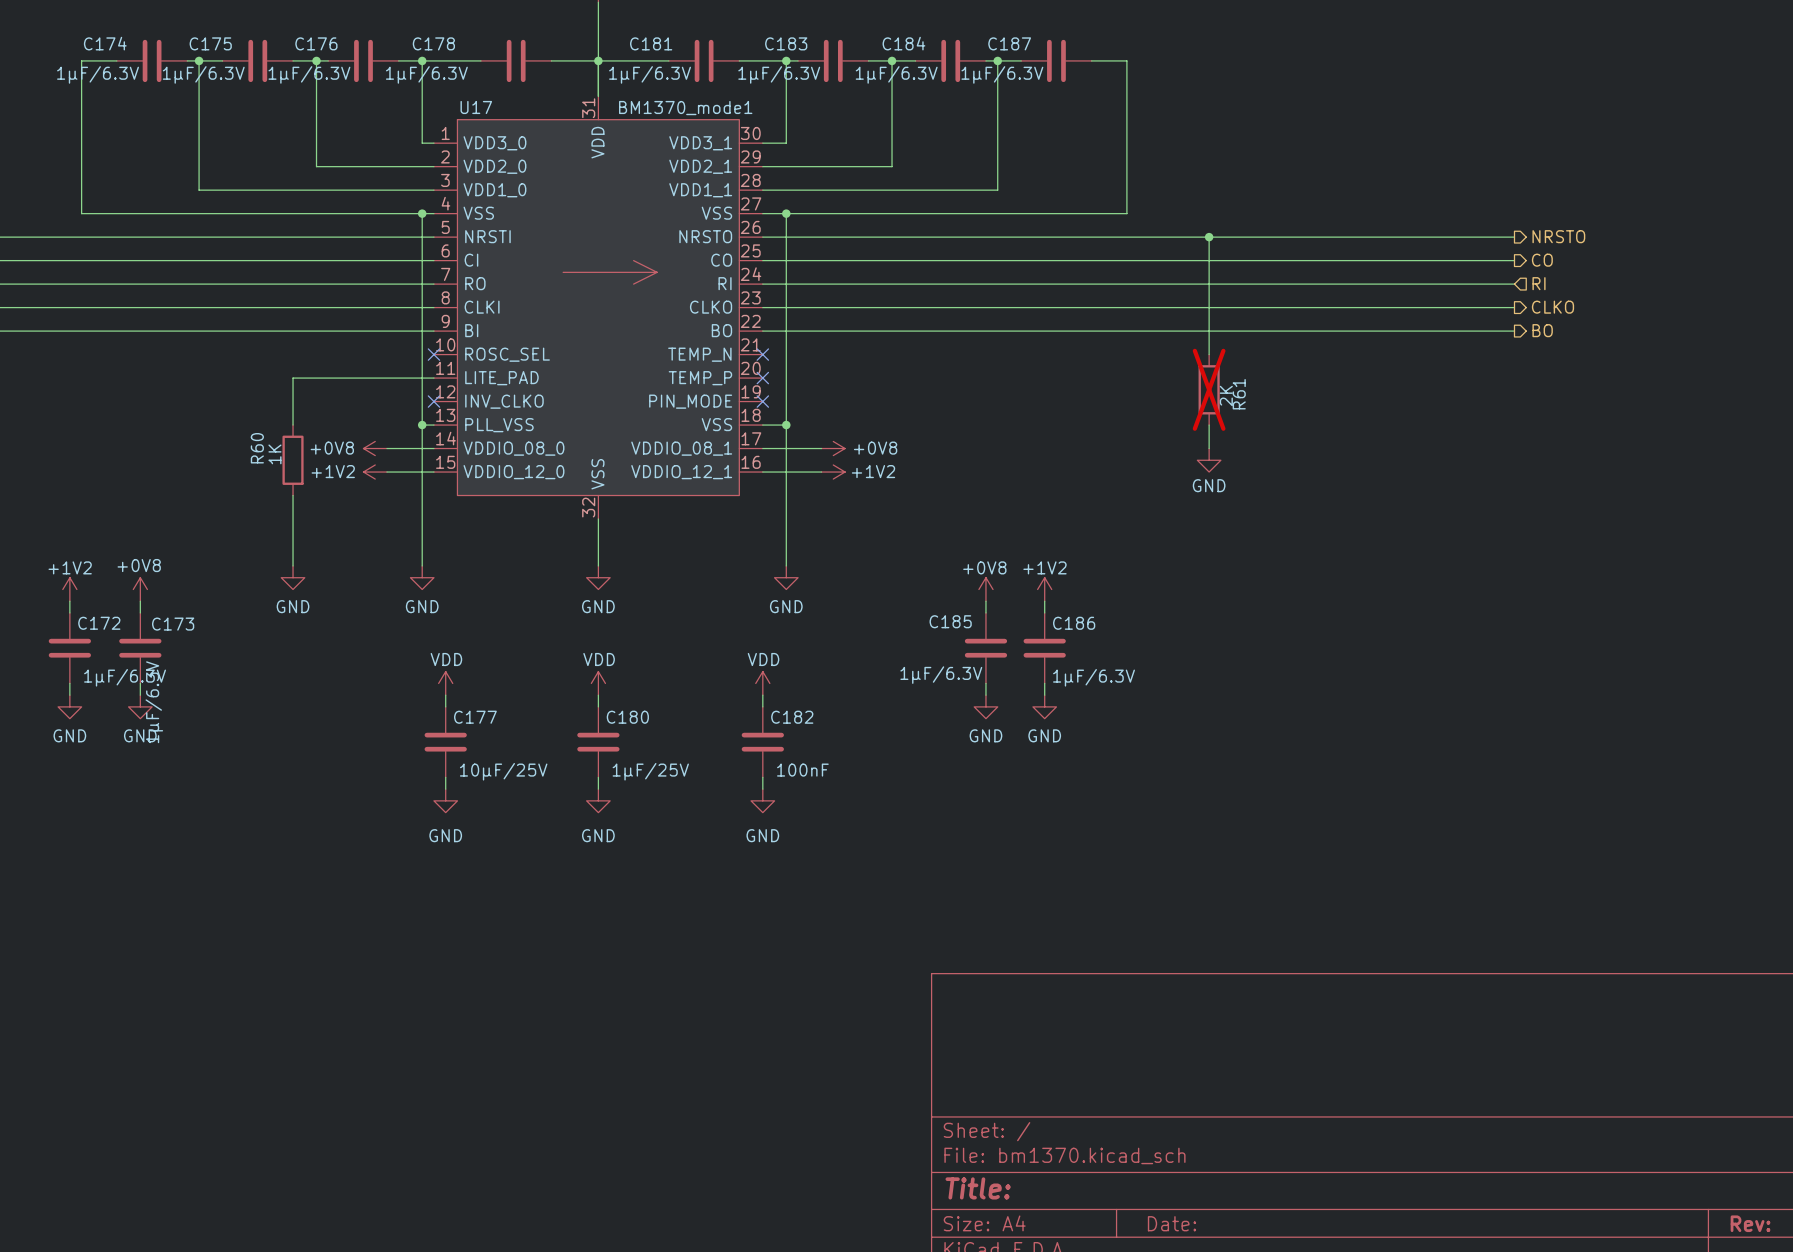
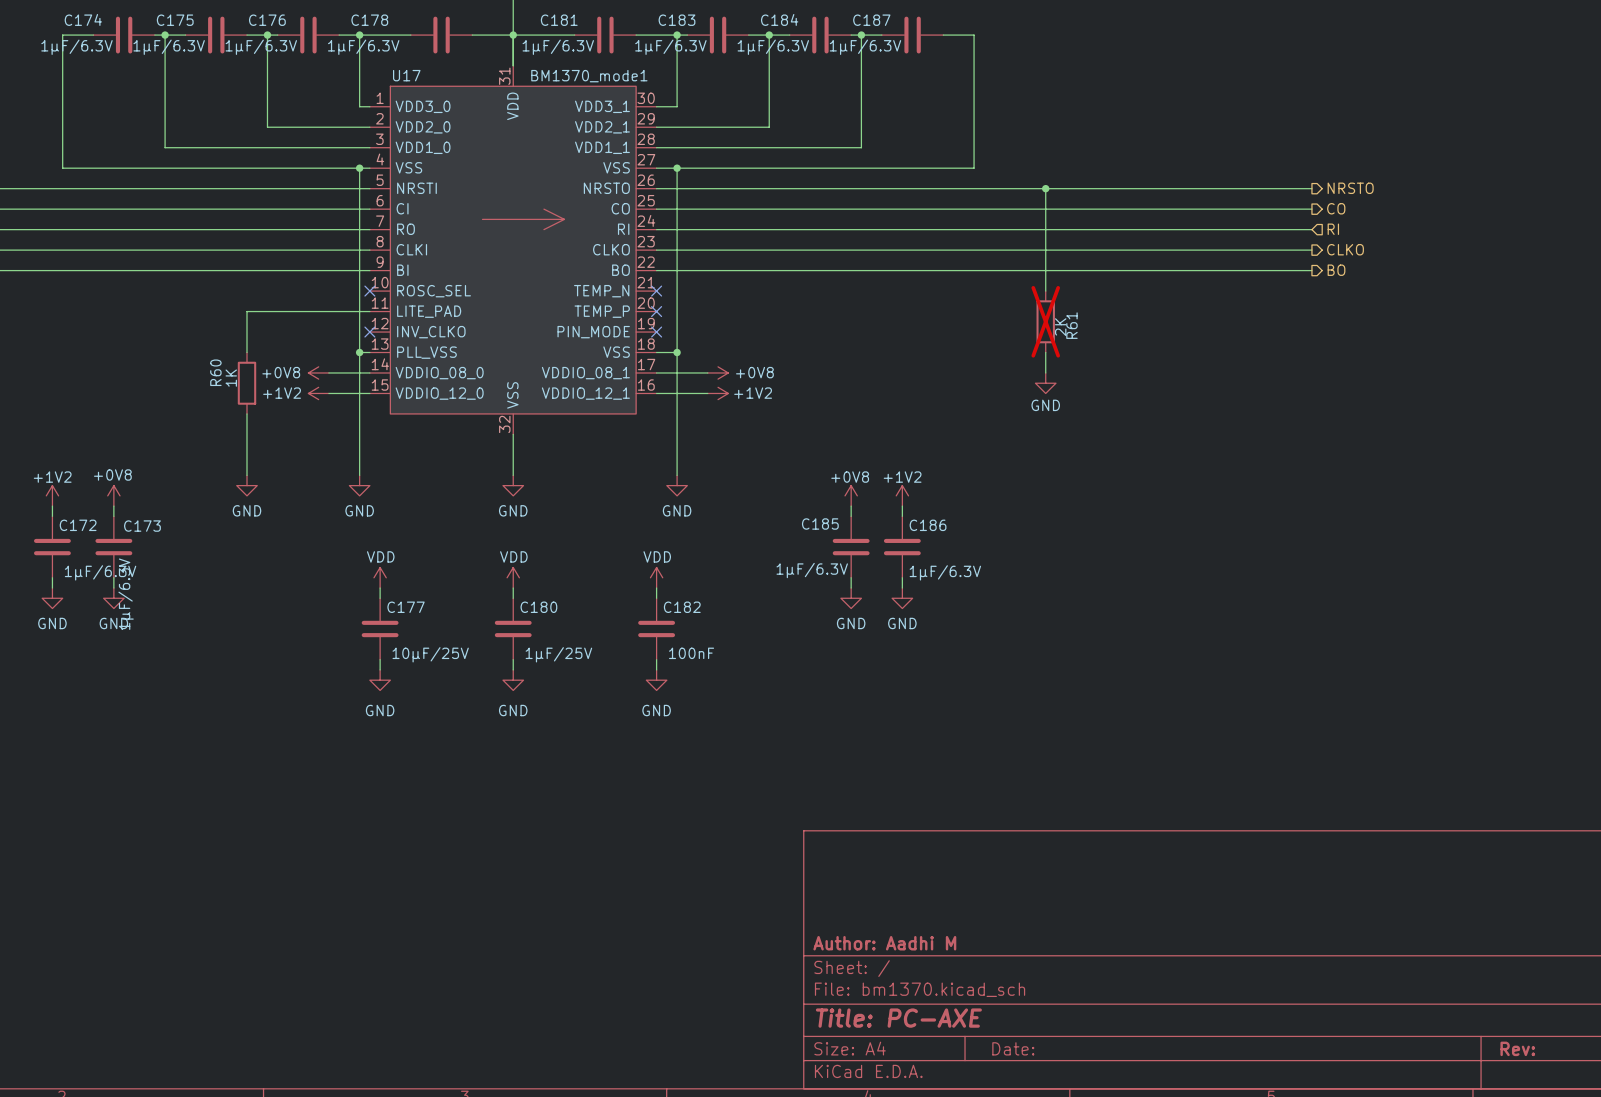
title block: none -> Author: Aadhi M (884, 943)
title block: Title: (978, 1188) -> Title: PC-AXE (898, 1018)

